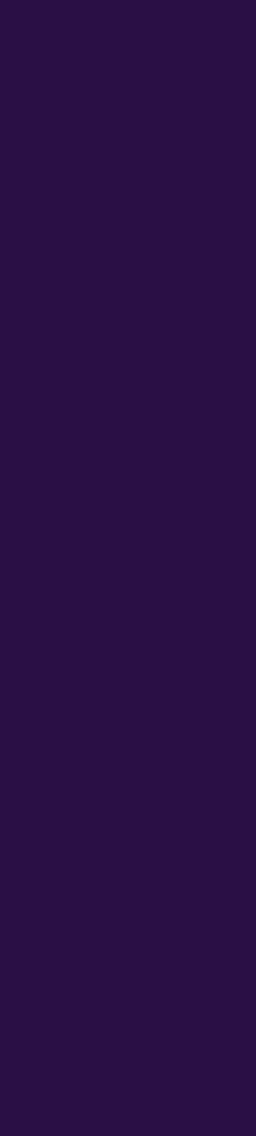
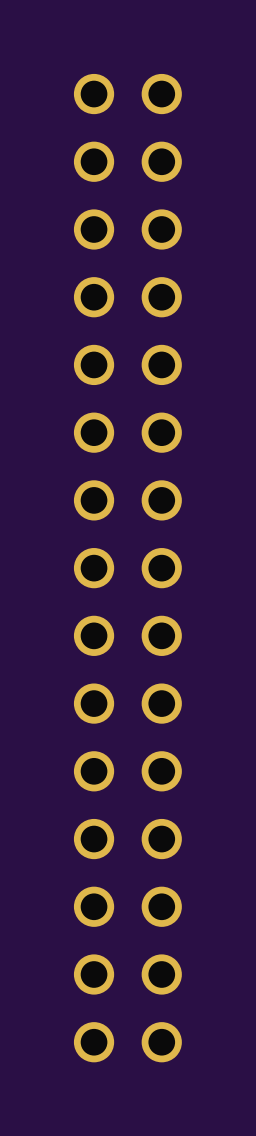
part: none -> (127, 568)

